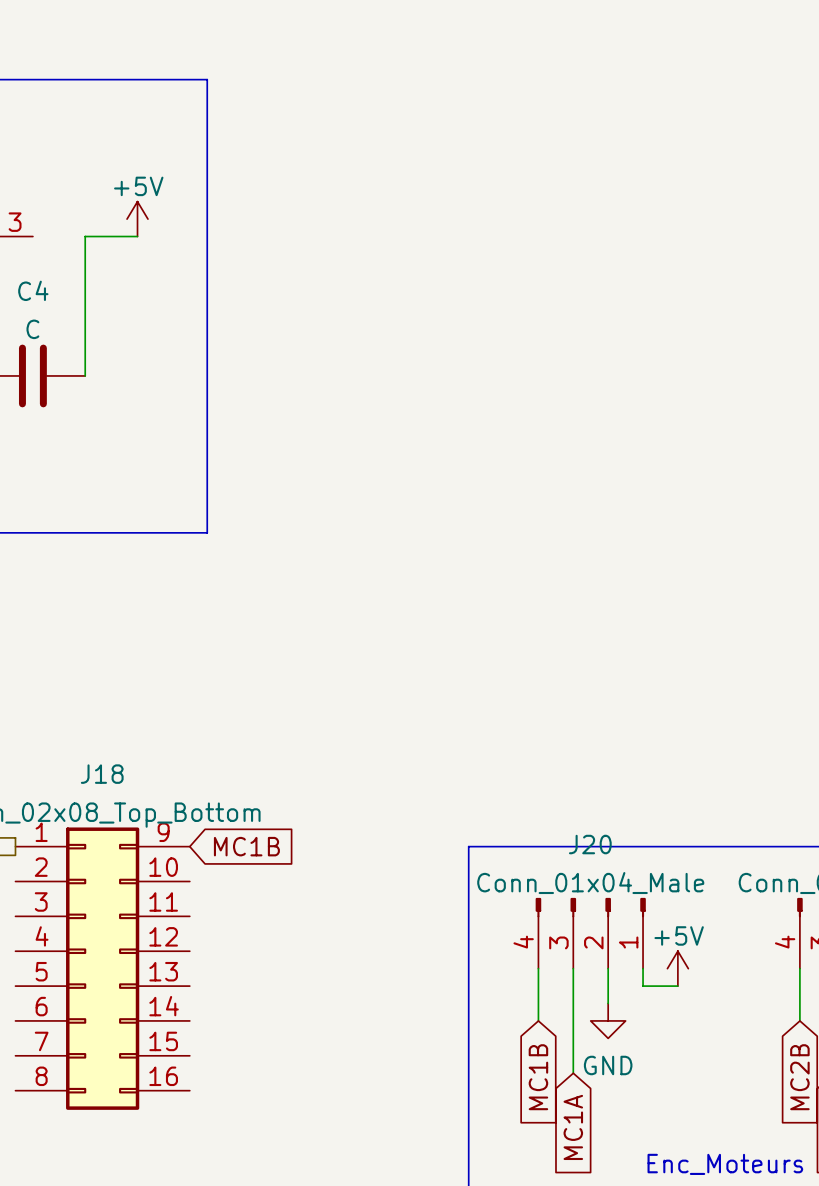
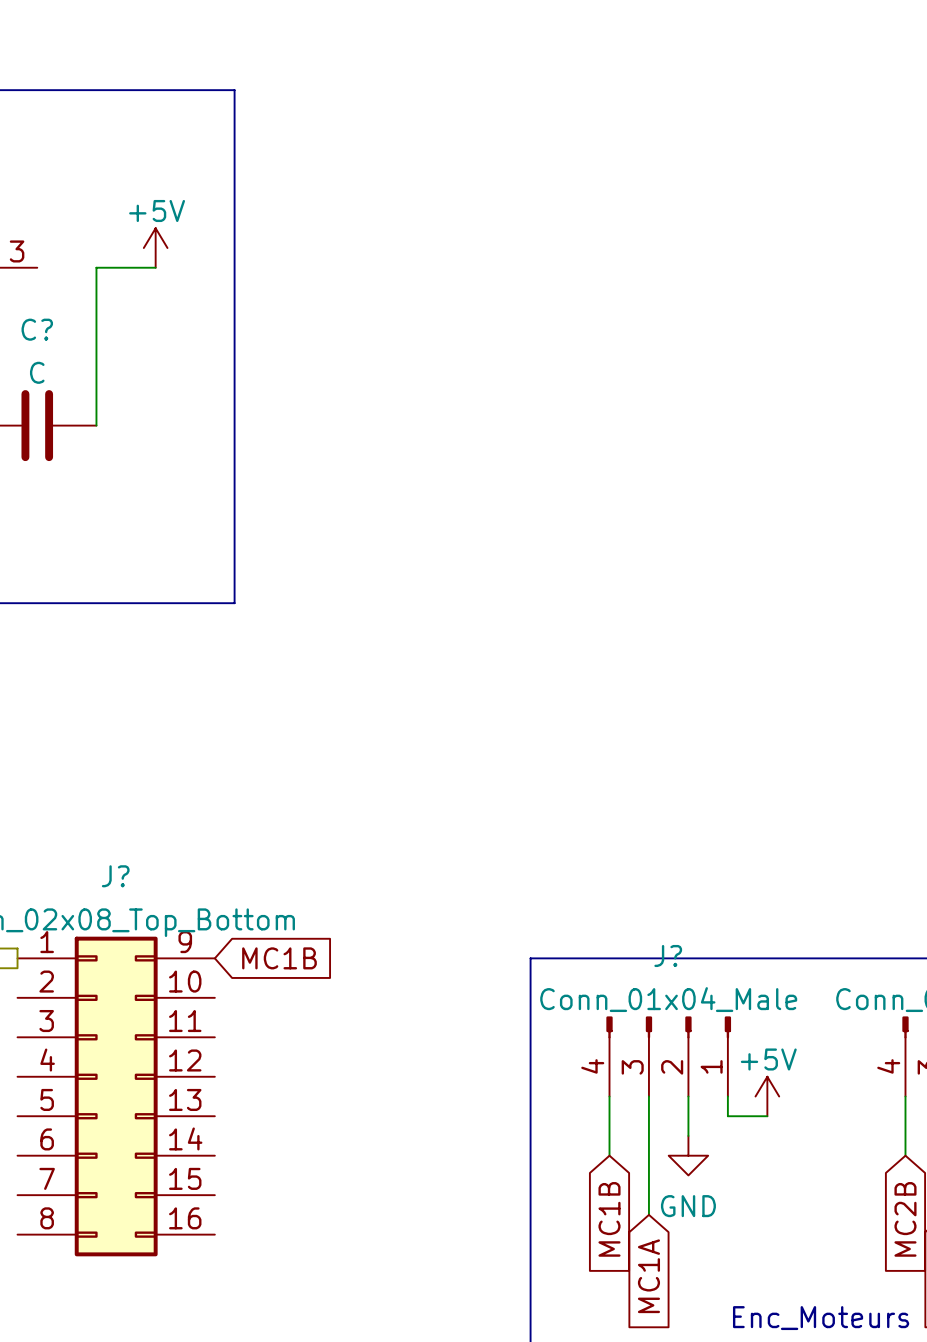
C4 name: C4 (33, 290) -> C? (37, 329)
J18 name: J18 (102, 774) -> J? (115, 876)
J20 name: J20 (590, 844) -> J? (668, 955)

